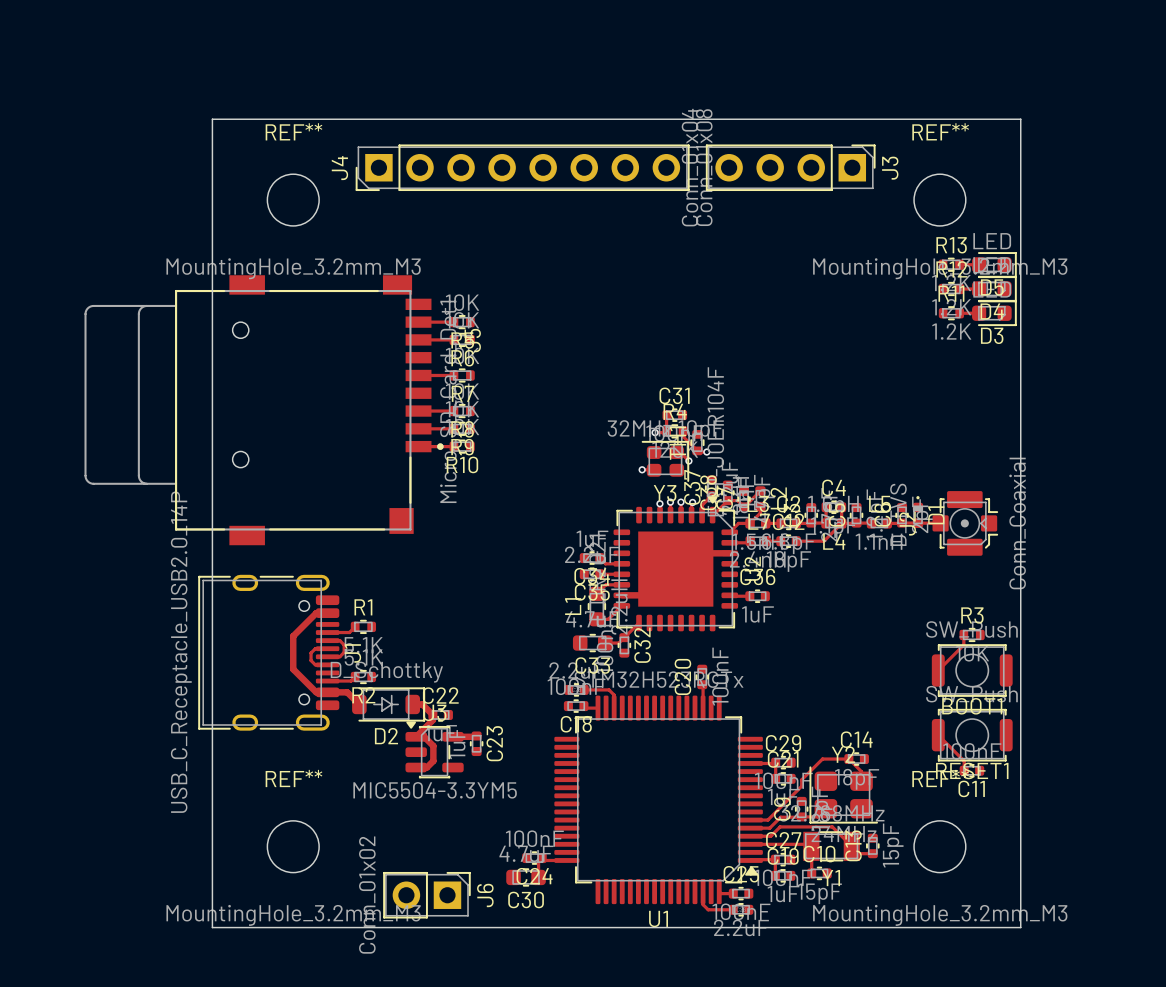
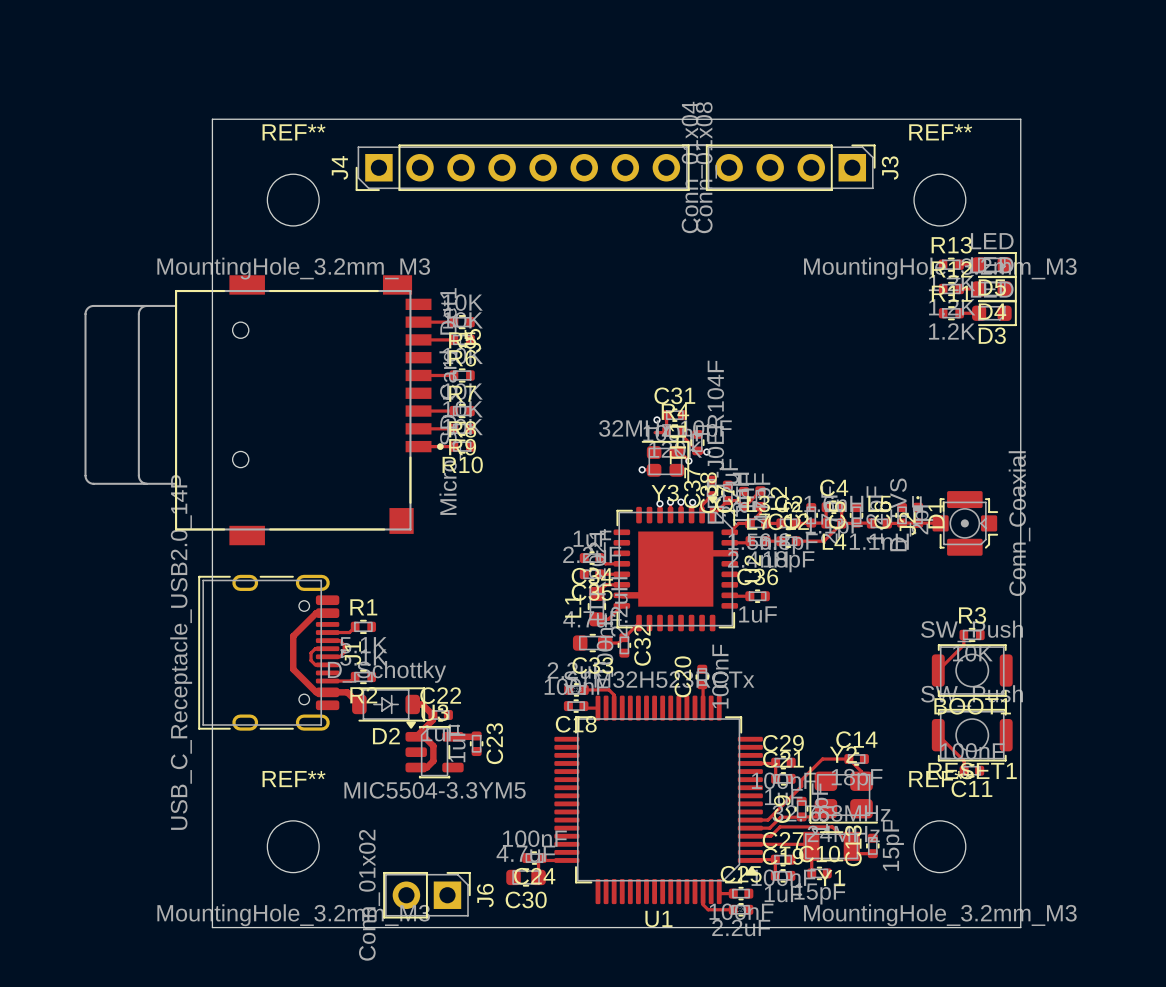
via position: (655, 432) -> (657, 419)

